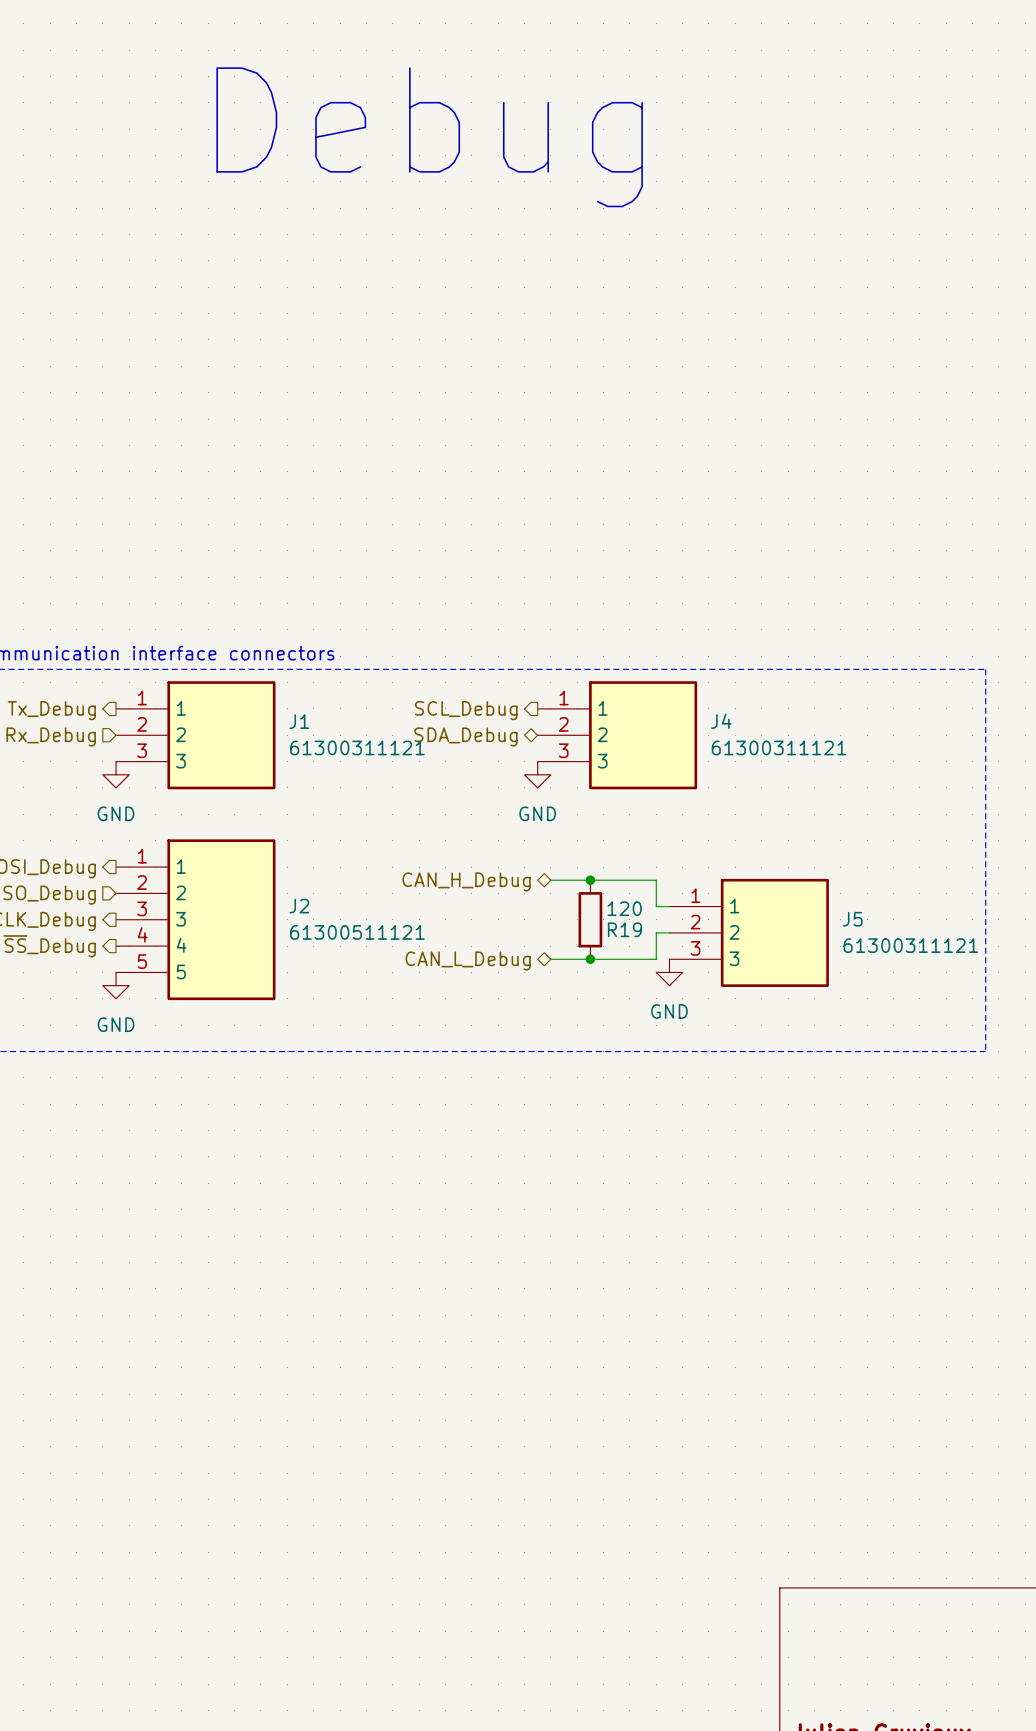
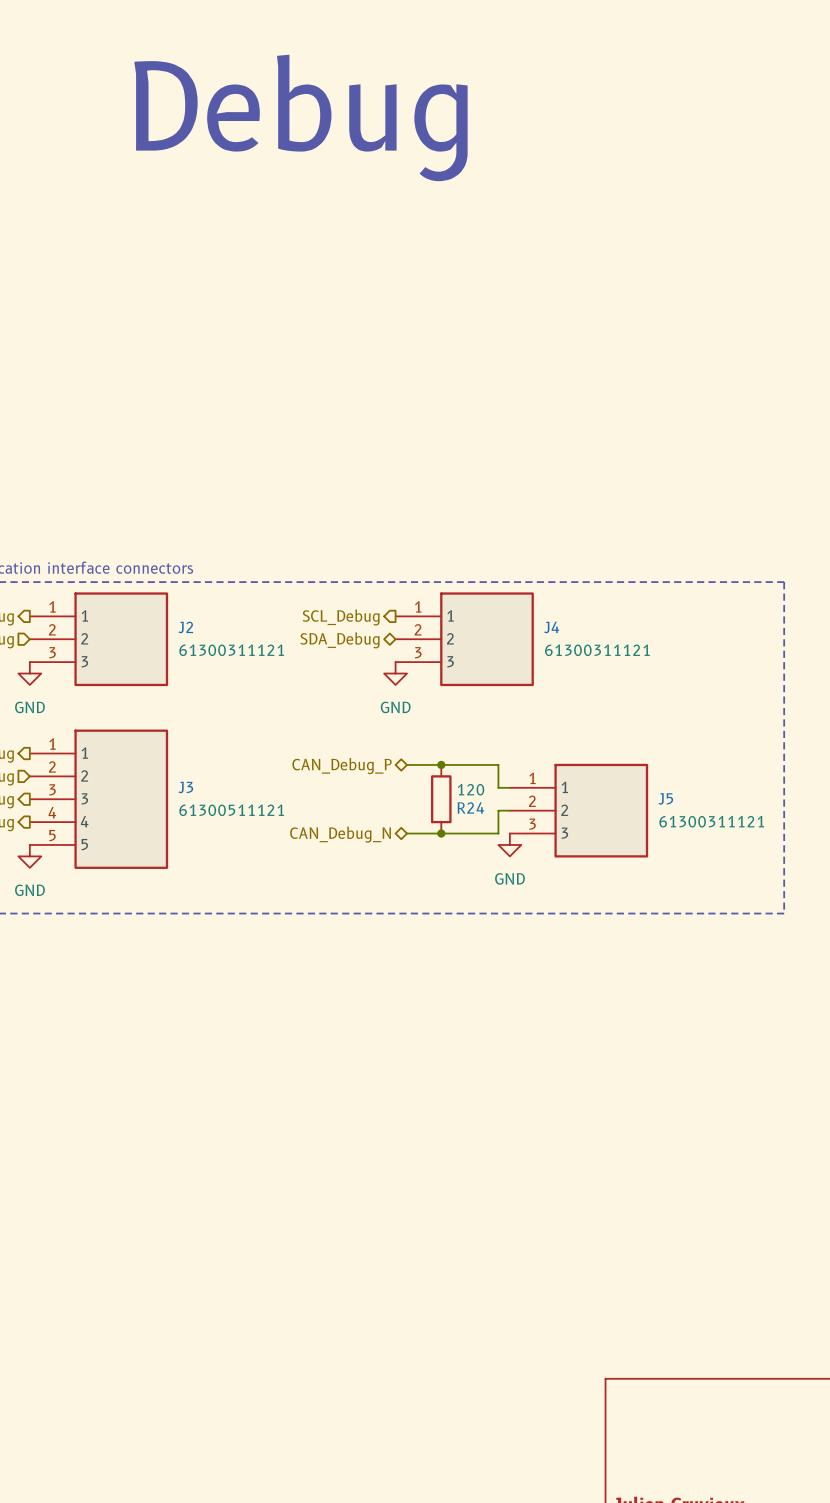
J1 name: J1 (299, 721) -> J2 (185, 627)
hierarchical label: CAN_H_Debug (466, 881) -> CAN_Debug_P (342, 766)
J2 name: J2 (299, 906) -> J3 (185, 787)
R19 name: R19 (624, 929) -> R24 (470, 807)
hierarchical label: CAN_L_Debug (468, 960) -> CAN_Debug_N (340, 834)

